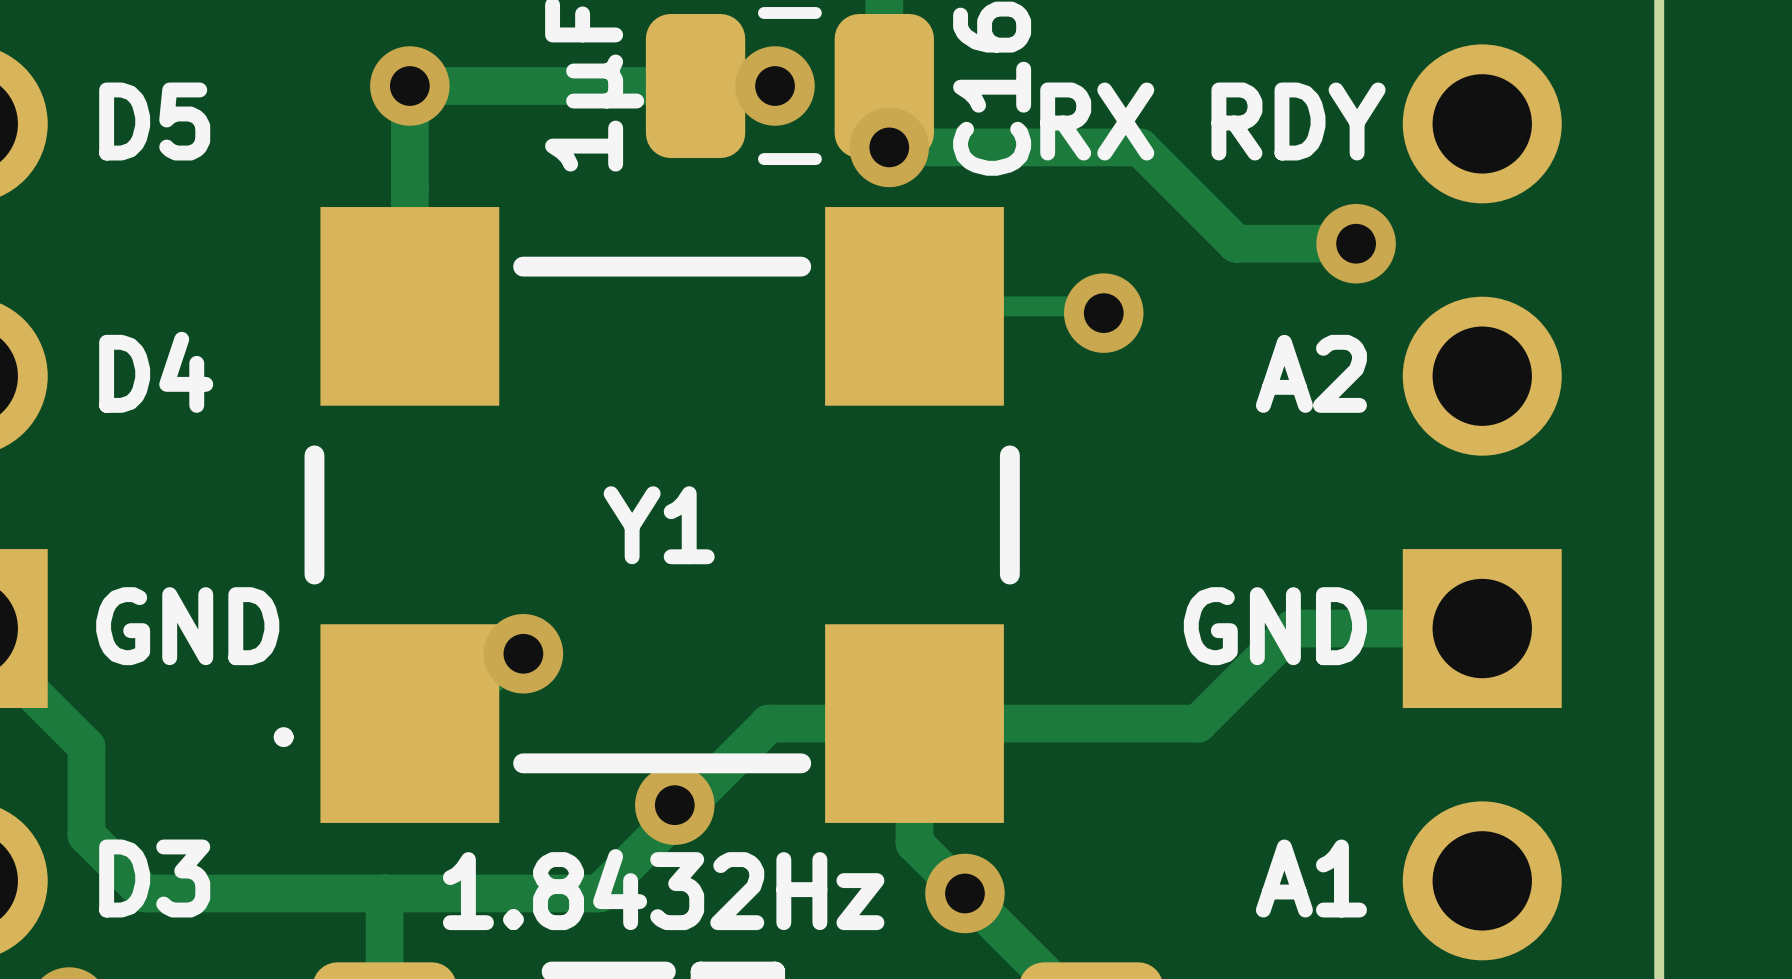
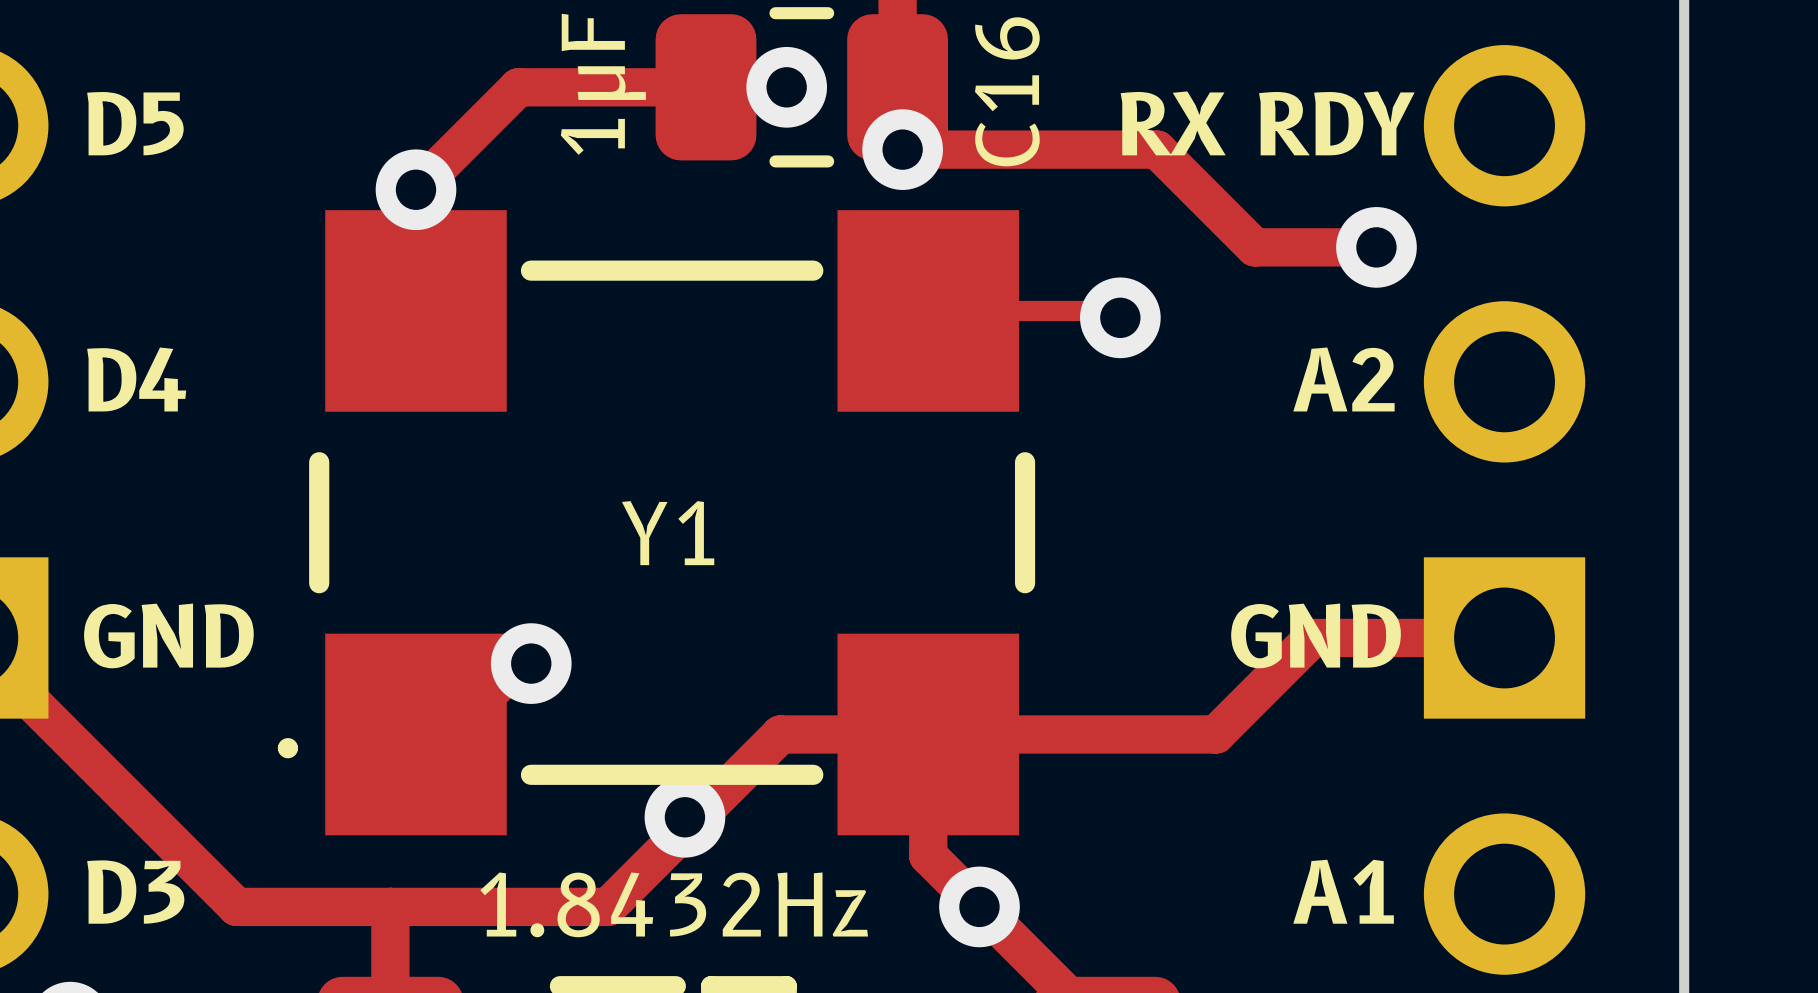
via position: (409, 86) -> (416, 189)
track: (510, 86) (409, 86) (409, 186) -> (518, 87) (416, 189)
track: (86, 746) (86, 835) (144, 893) (233, 893) -> (87, 757) (236, 906)

